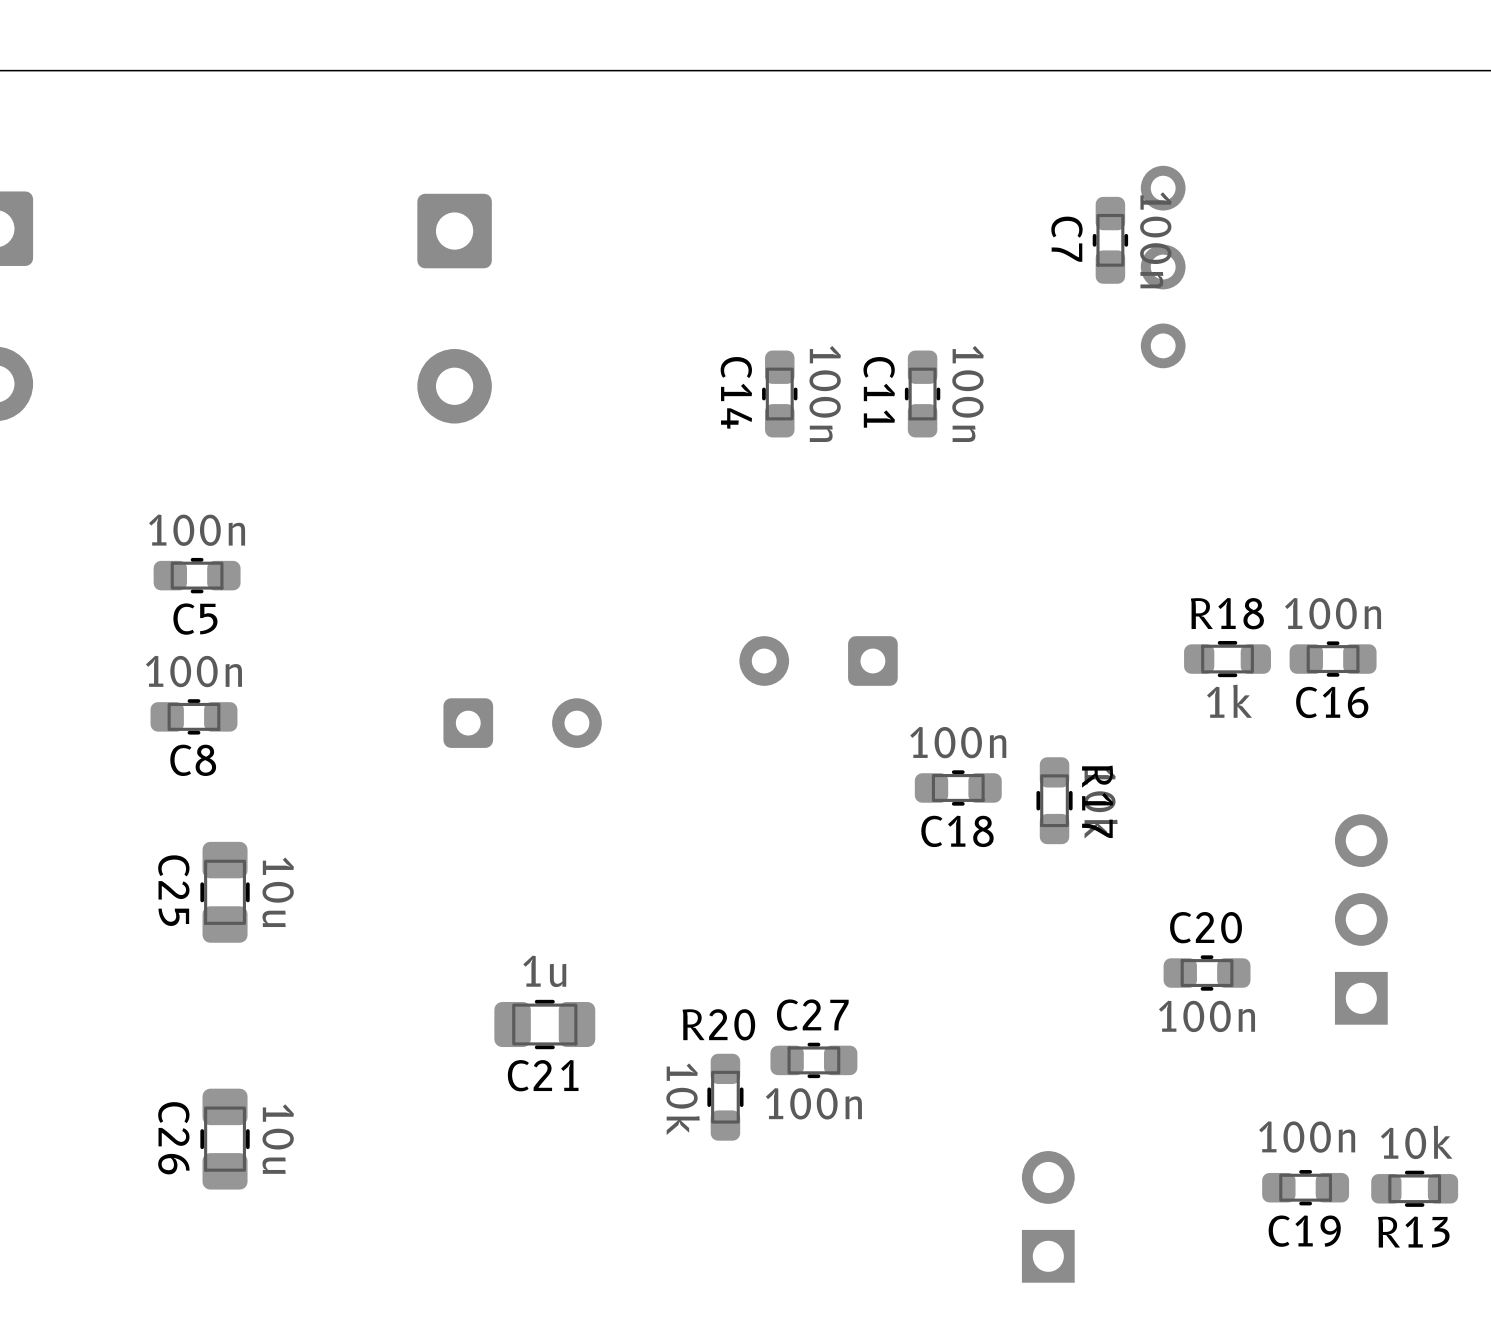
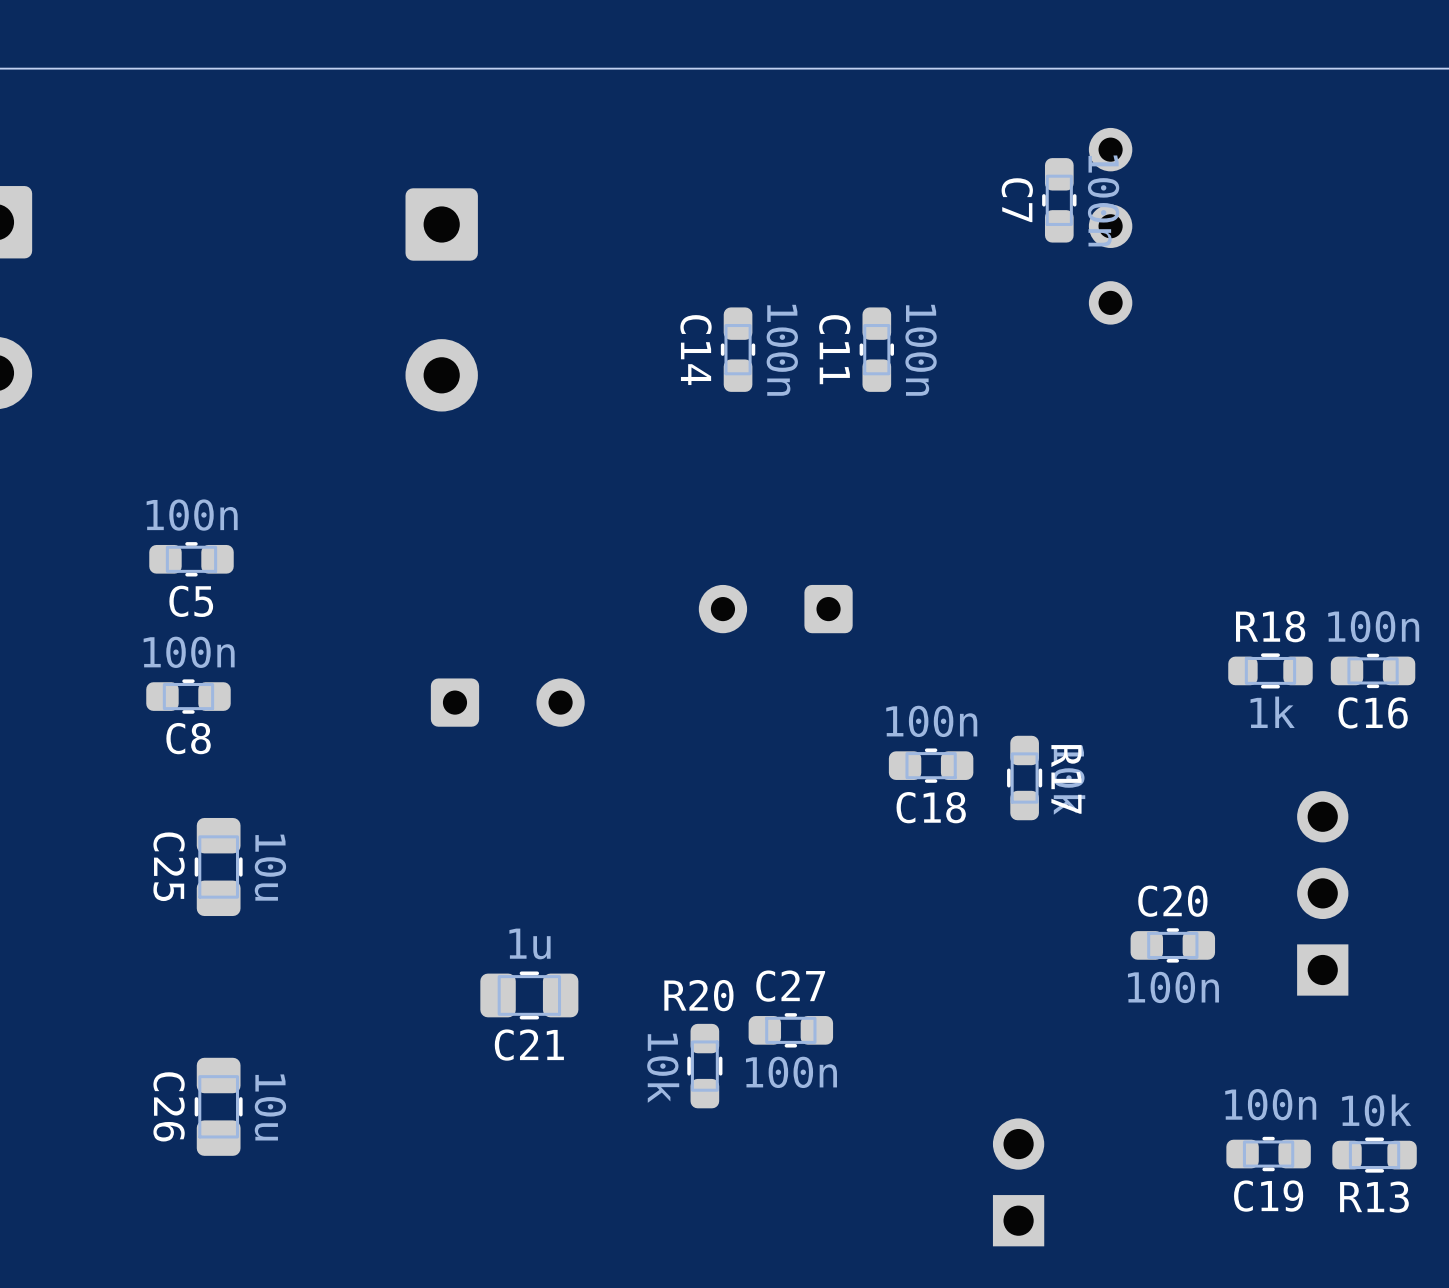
C7 position: (1110, 240) -> (1059, 200)
part position: (1163, 267) -> (1110, 226)
C14 position: (779, 394) -> (738, 349)
C11 position: (922, 394) -> (876, 349)
R18 position: (1227, 659) -> (1270, 670)
C16 position: (1333, 659) -> (1373, 670)
part position: (818, 661) -> (775, 609)

